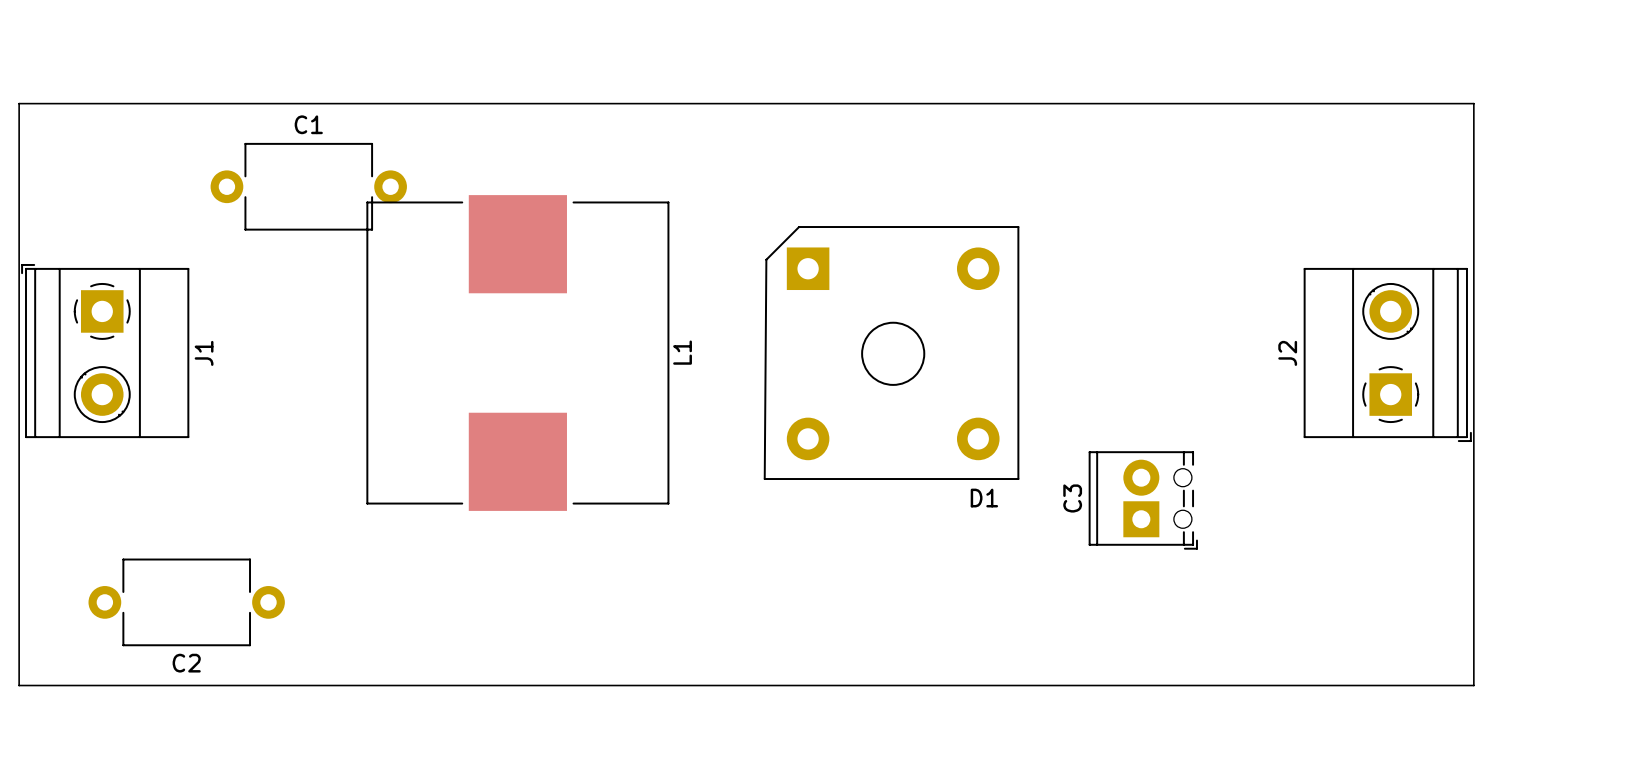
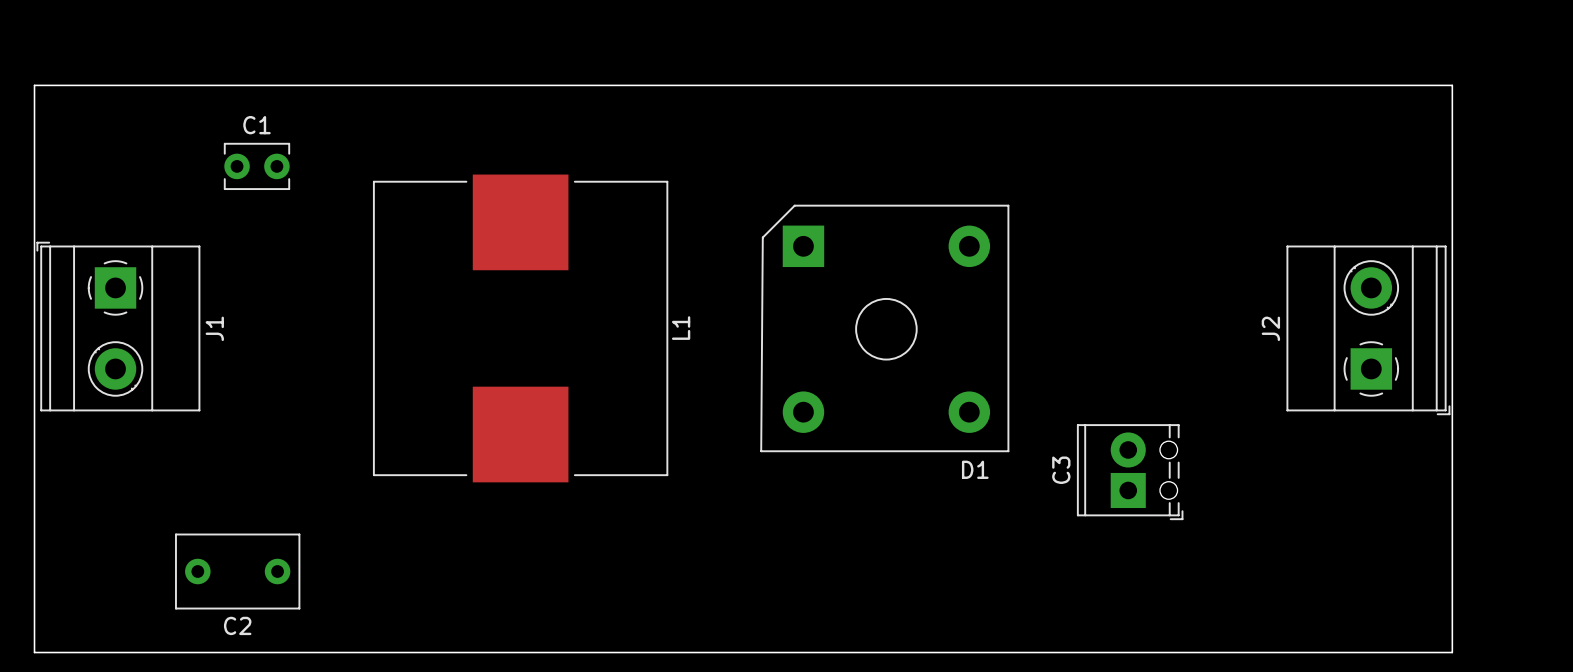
C1 footprint: [210, 142, 407, 231] -> [223, 142, 291, 191]
C2 footprint: [88, 558, 285, 647] -> [175, 533, 301, 610]

